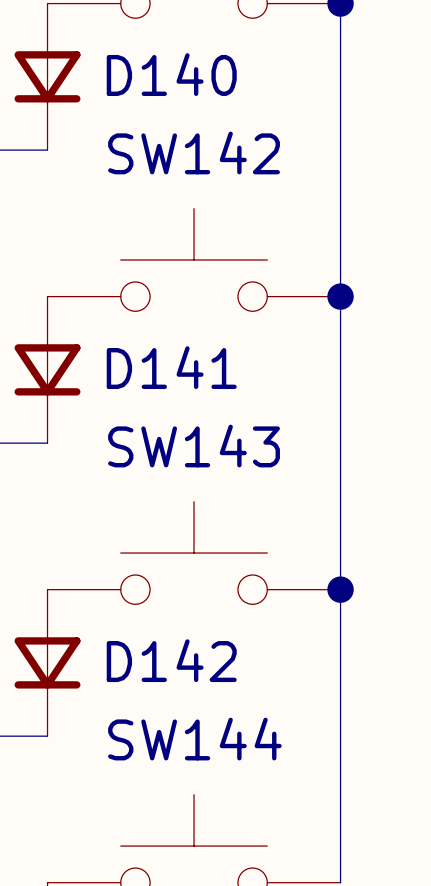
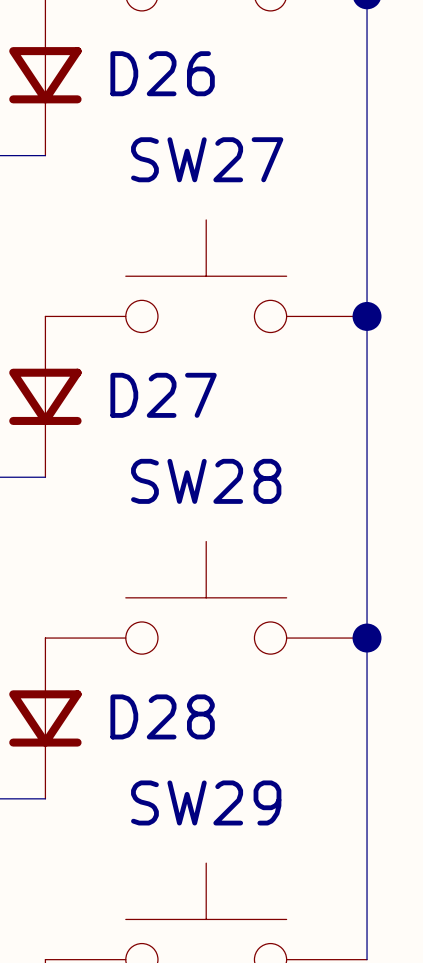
D140 name: D140 (171, 74) -> D26 (162, 73)
SW142 name: SW142 (194, 152) -> SW27 (207, 159)
D141 name: D141 (171, 367) -> D27 (163, 395)
SW143 name: SW143 (194, 446) -> SW28 (206, 481)
D142 name: D142 (171, 660) -> D28 (162, 716)
SW144 name: SW144 (194, 739) -> SW29 (206, 802)

